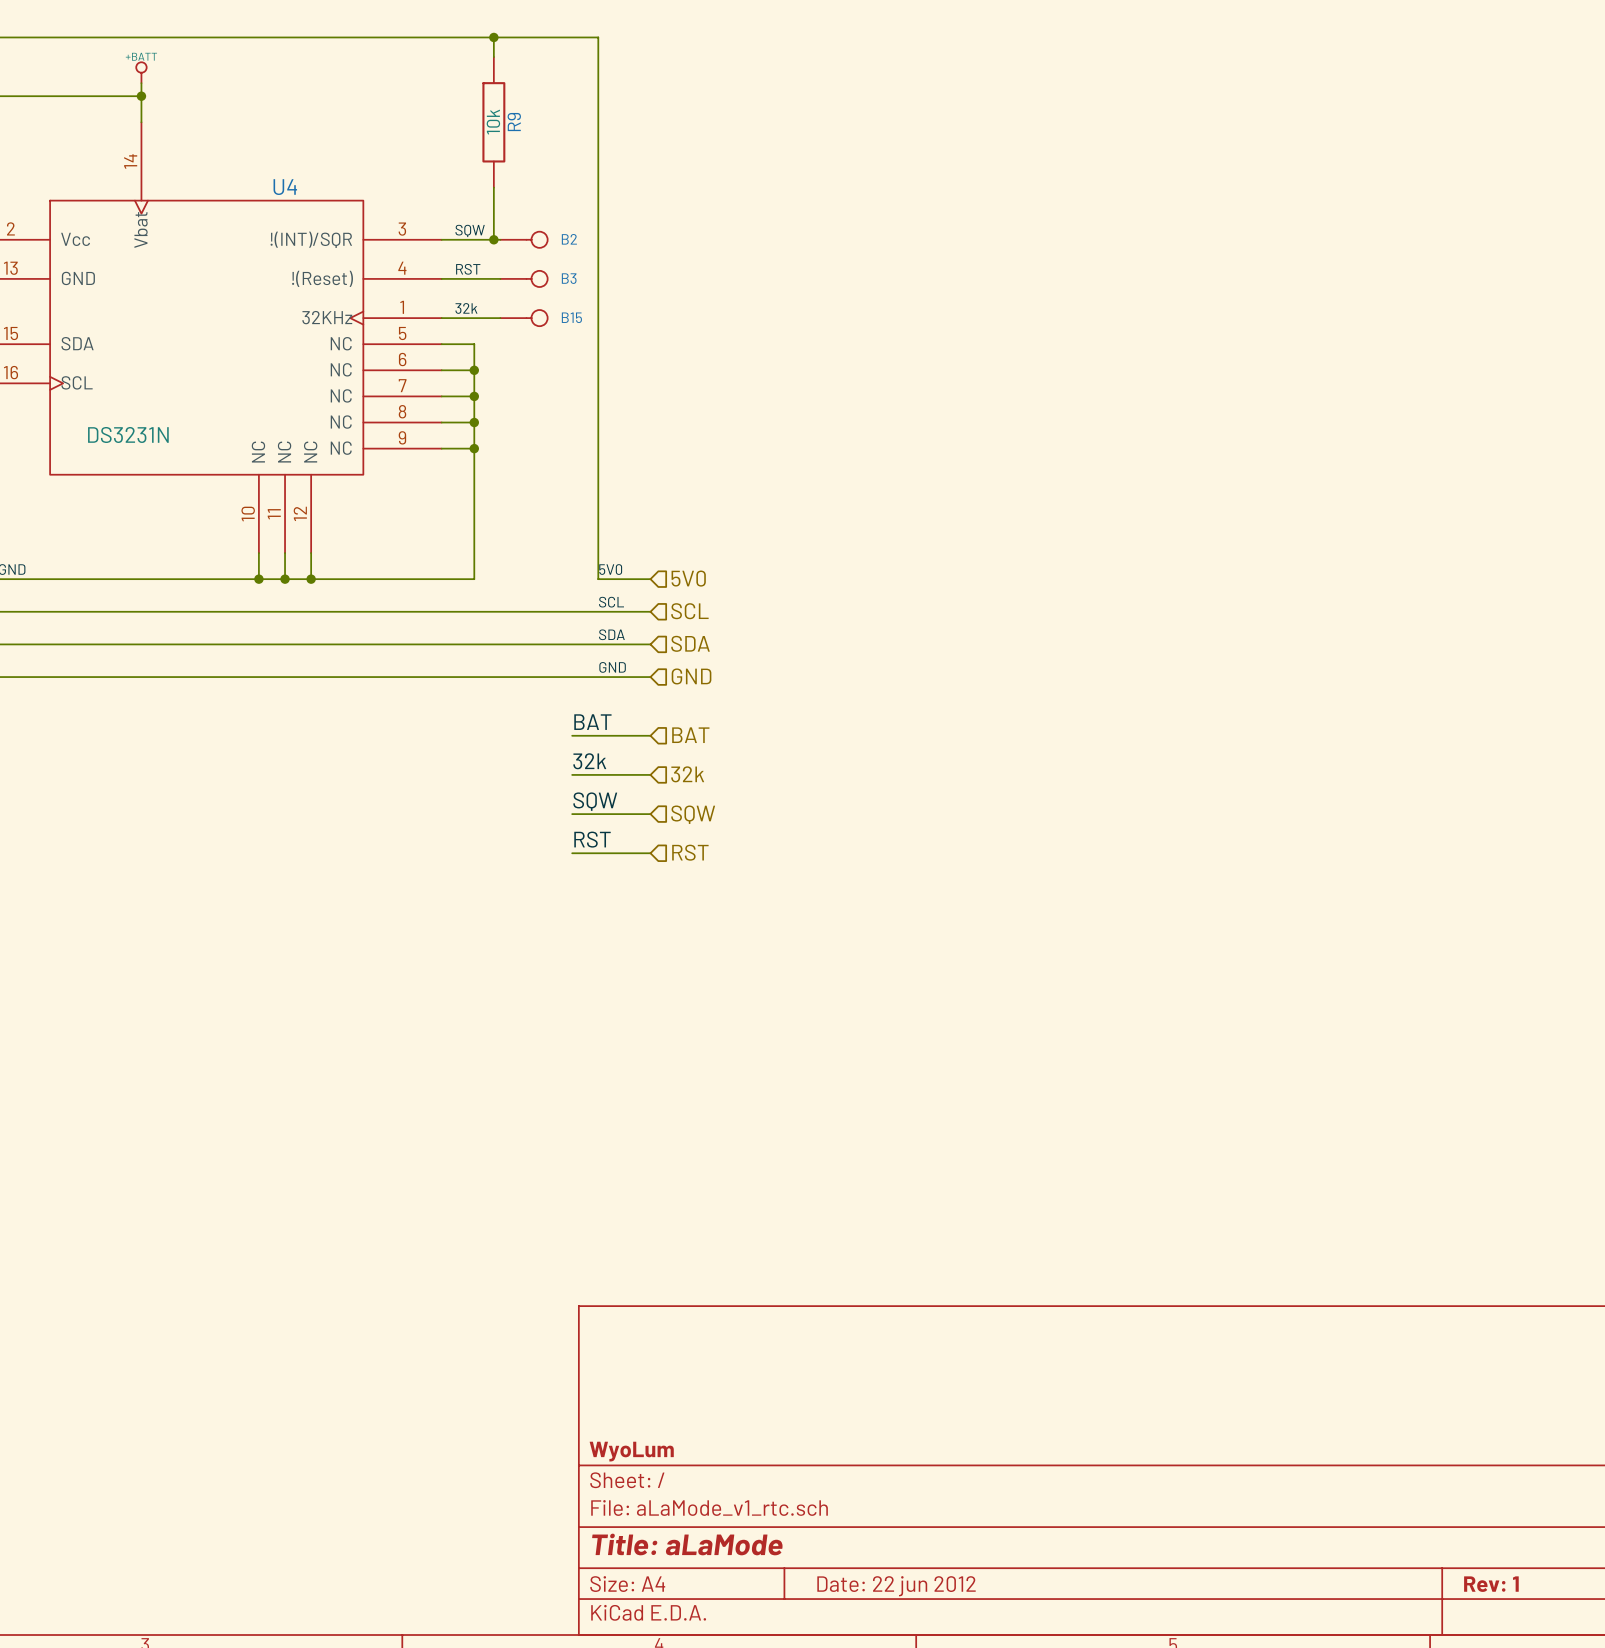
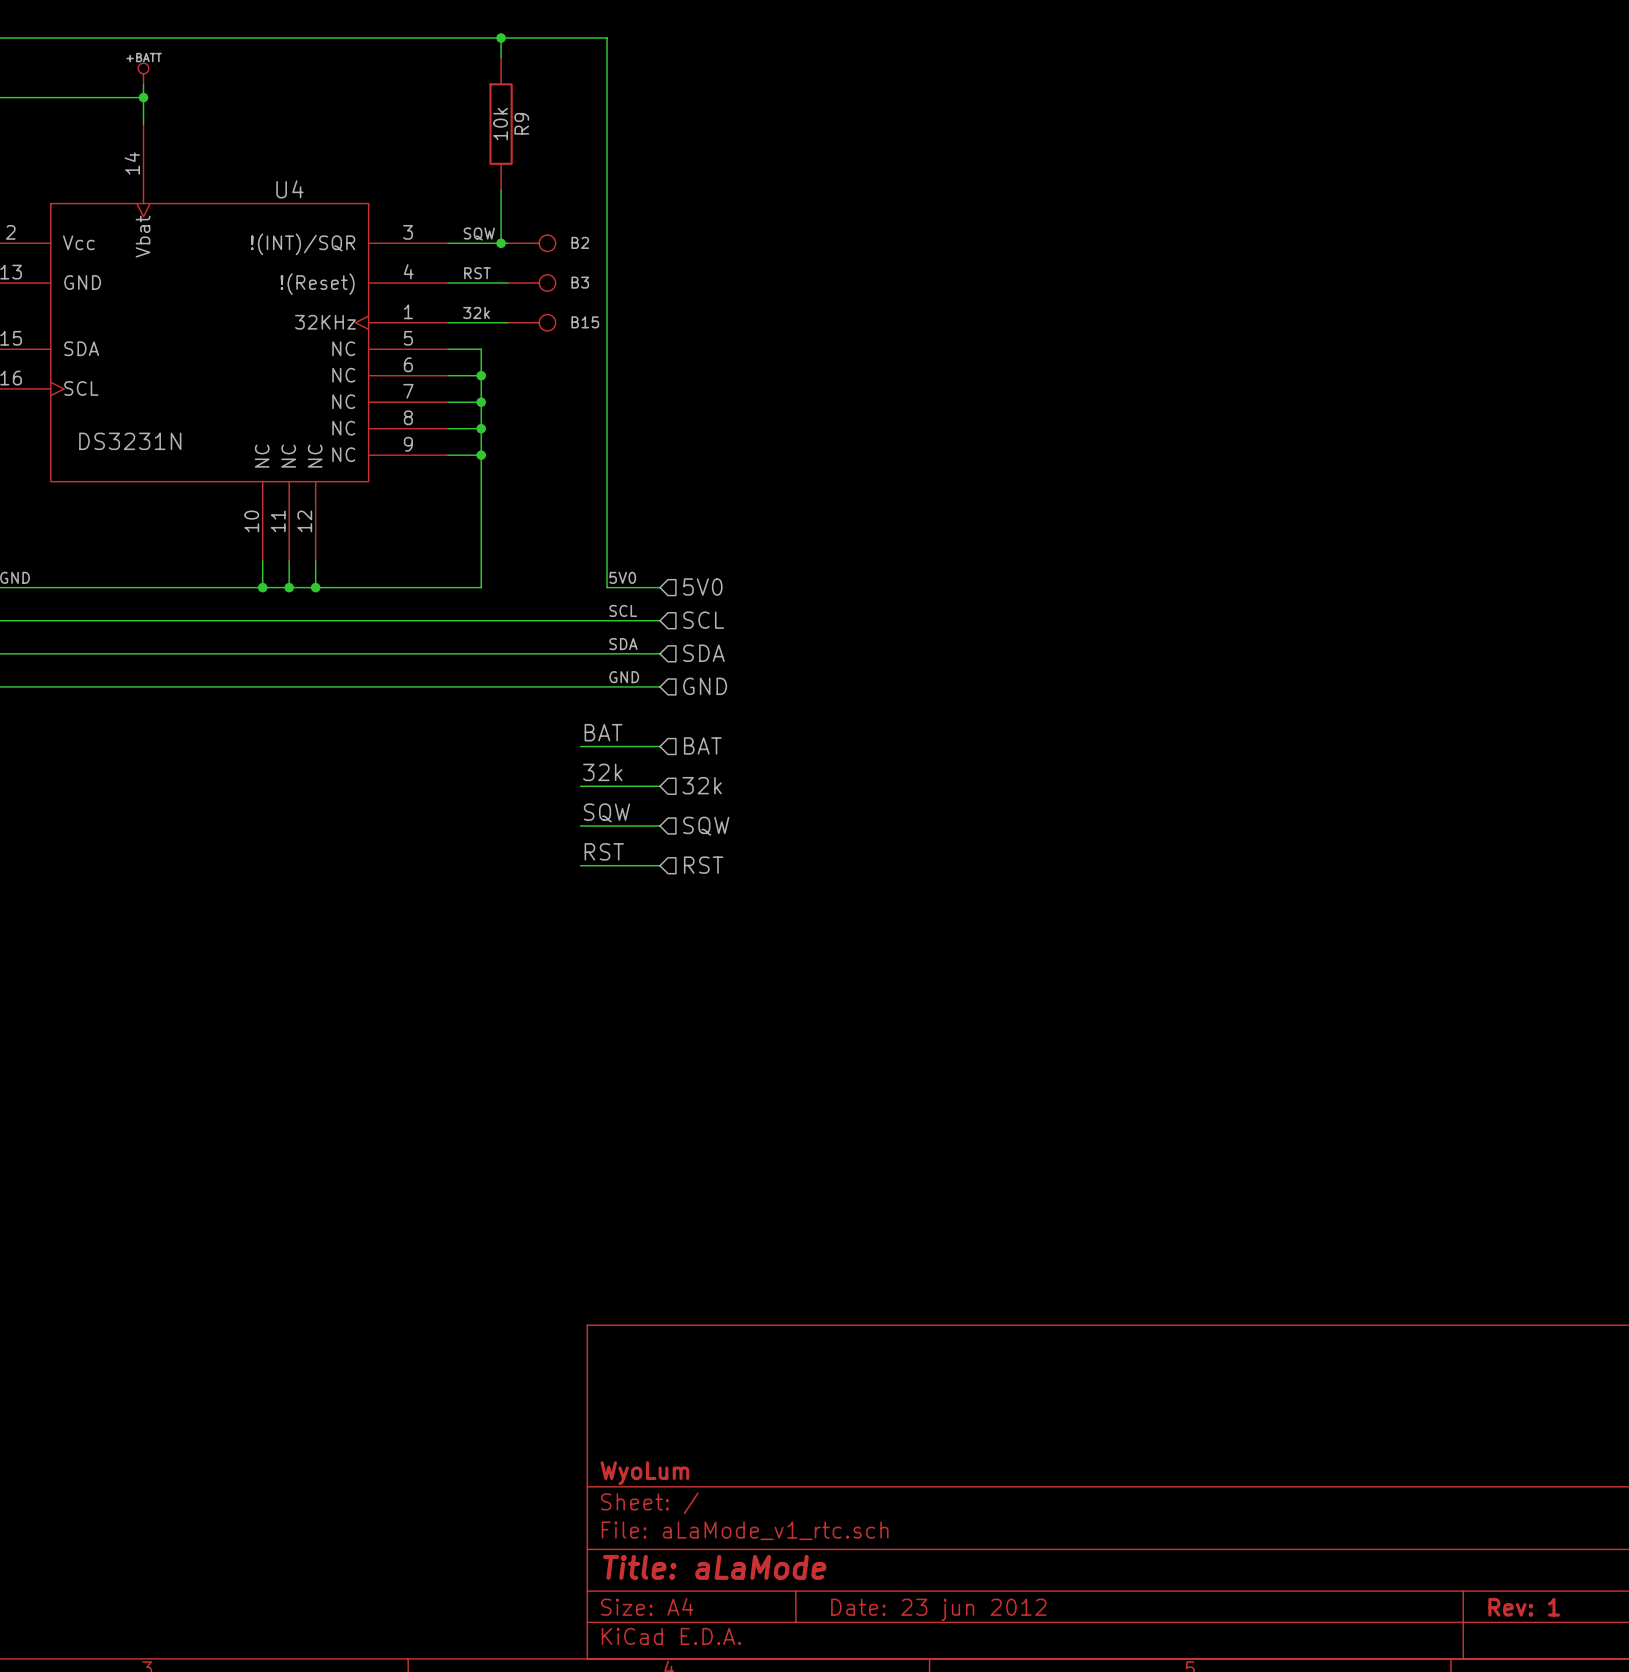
title block: Date: 22 jun 2012 (896, 1586) -> Date: 23 jun 2012 (938, 1609)

